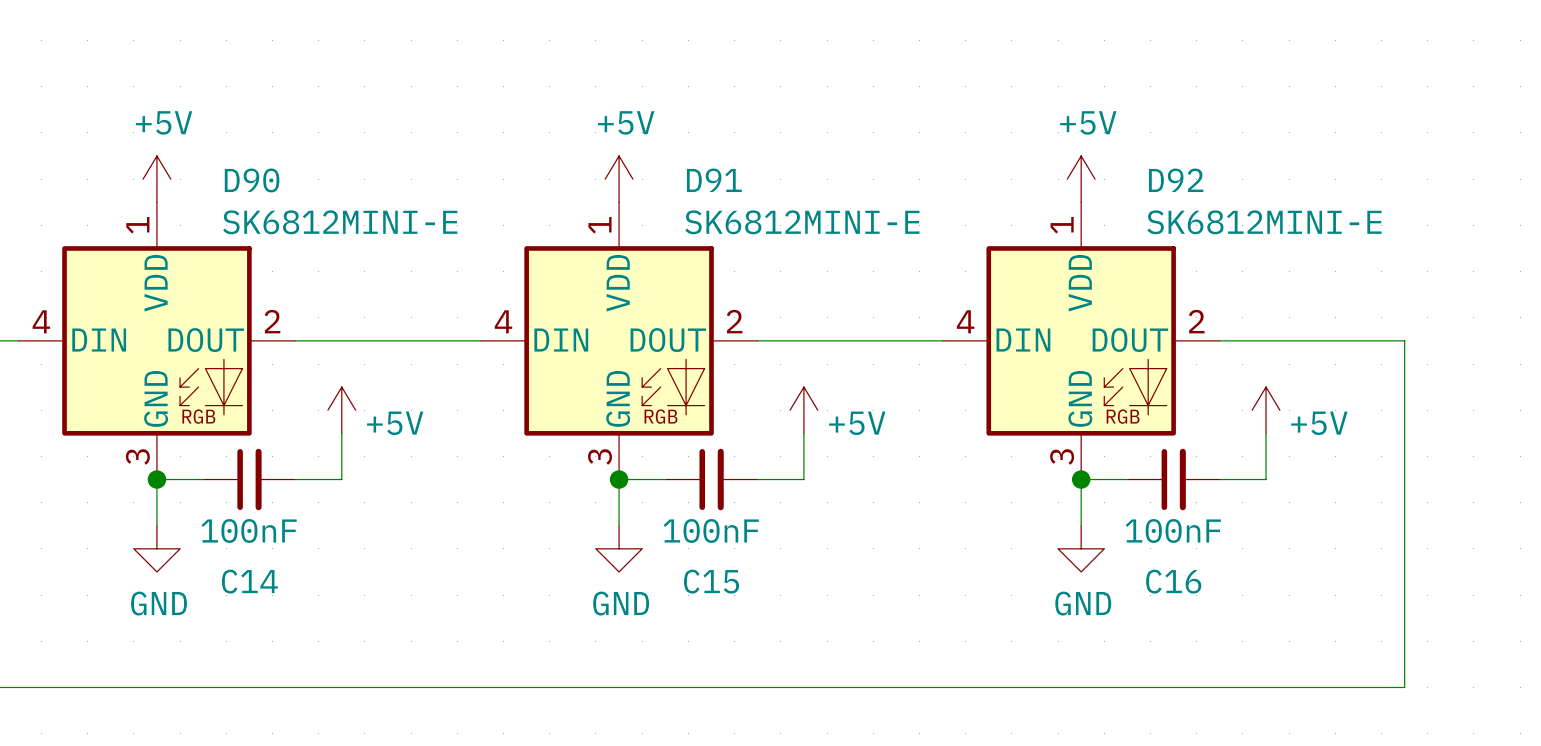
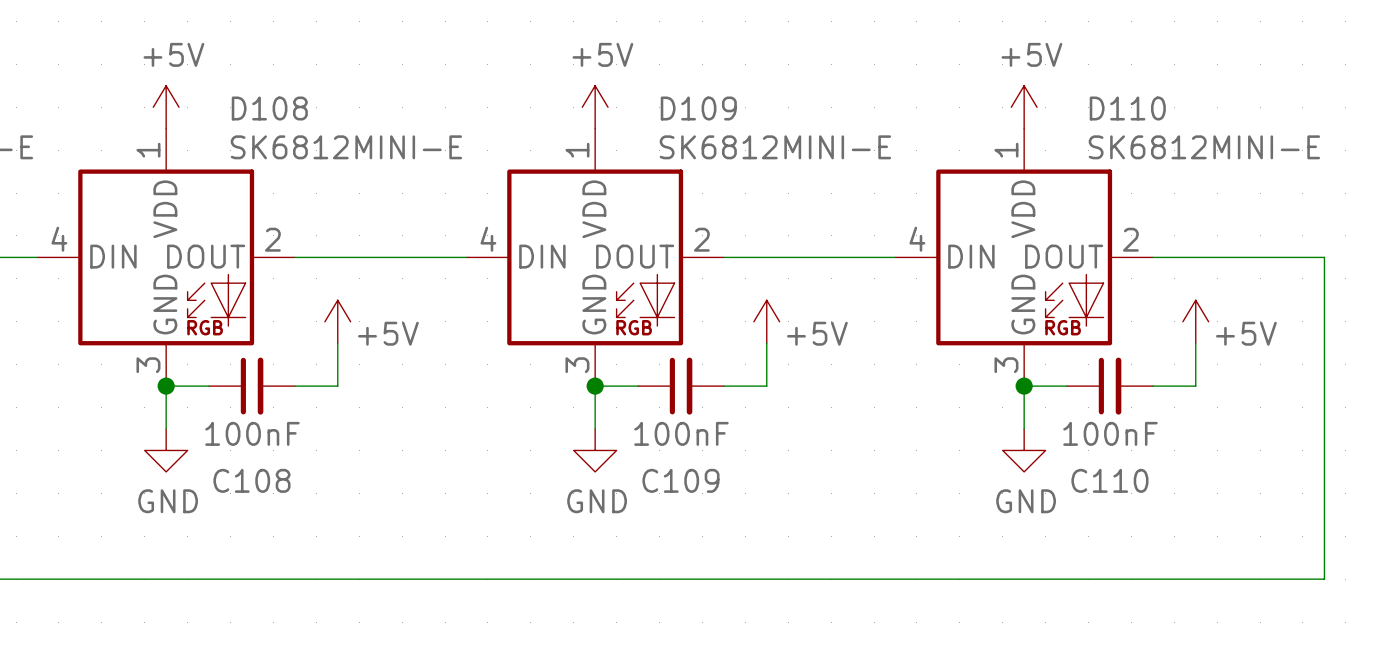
D90 name: D90 (252, 180) -> D108 (269, 108)
D91 name: D91 (714, 180) -> D109 (698, 108)
D92 name: D92 (1176, 180) -> D110 (1127, 108)
C14 name: C14 (249, 581) -> C108 (251, 480)
C15 name: C15 (711, 581) -> C109 (680, 480)
C16 name: C16 (1173, 581) -> C110 (1109, 480)

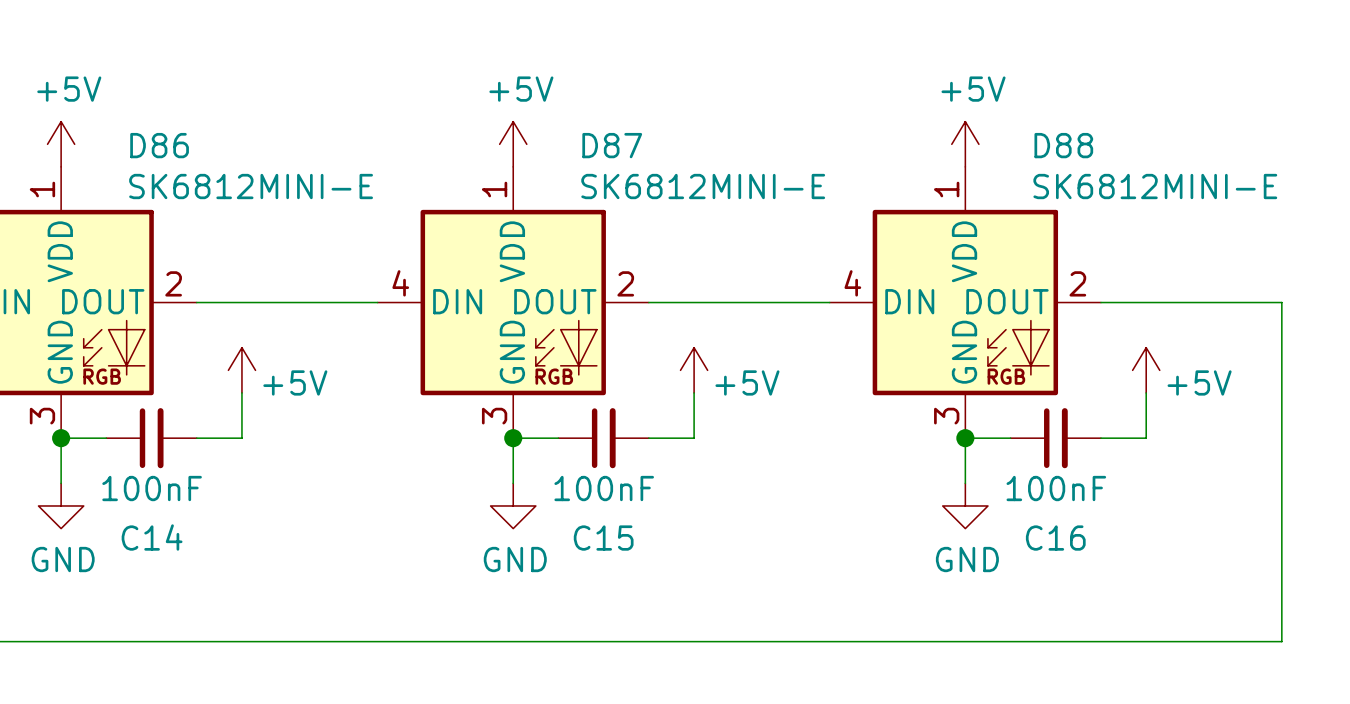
D108 name: D108 (269, 108) -> D86 (159, 145)
D109 name: D109 (698, 108) -> D87 (612, 145)
D110 name: D110 (1127, 108) -> D88 (1063, 145)
C108 name: C108 (251, 480) -> C14 (152, 537)
C109 name: C109 (680, 480) -> C15 (603, 538)
C110 name: C110 (1109, 480) -> C16 (1055, 538)

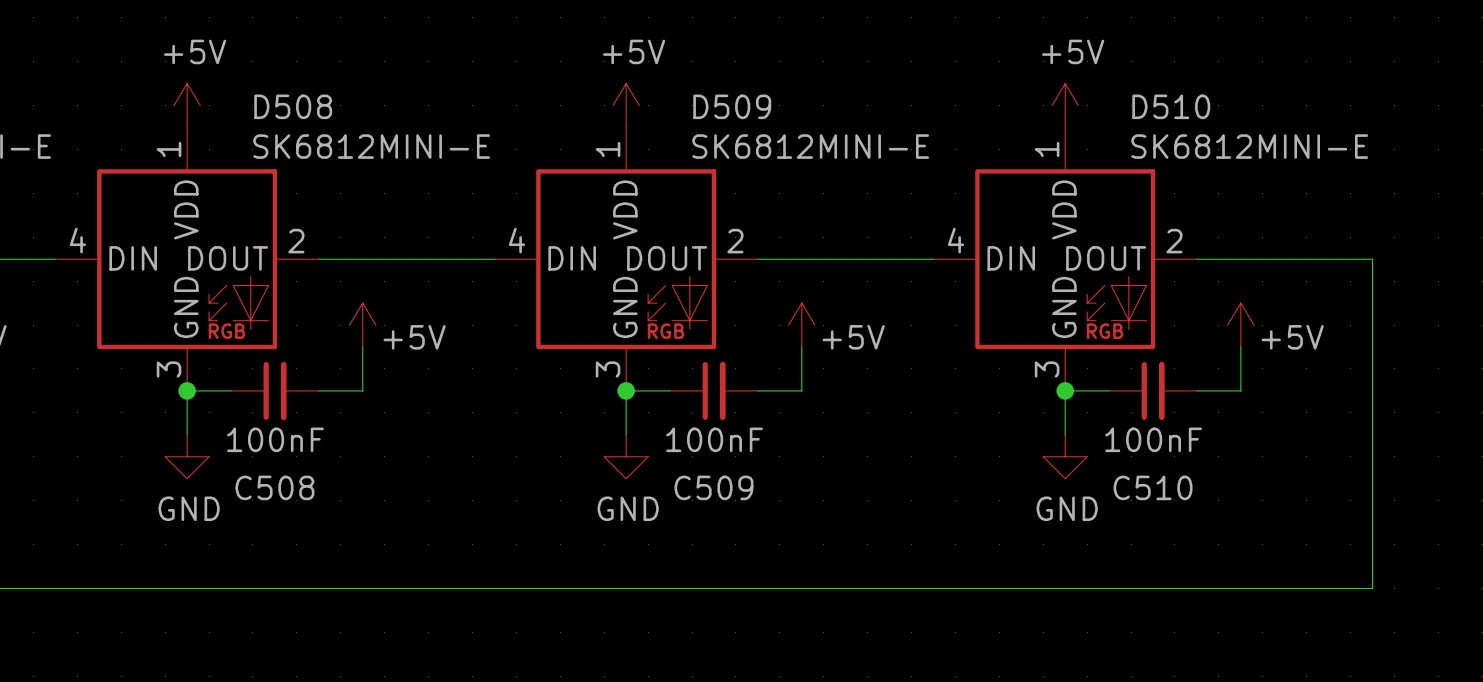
D86 name: D86 (159, 145) -> D508 (293, 106)
D87 name: D87 (612, 145) -> D509 (732, 106)
D88 name: D88 (1063, 145) -> D510 (1171, 106)
C14 name: C14 (152, 537) -> C508 (274, 487)
C15 name: C15 (603, 538) -> C509 (713, 487)
C16 name: C16 (1055, 538) -> C510 (1153, 487)

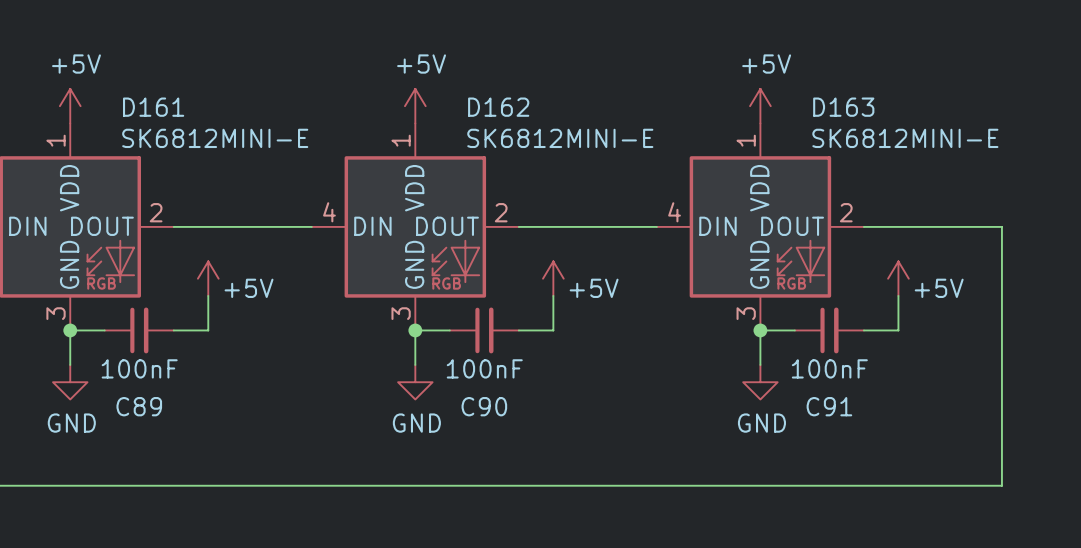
D508 name: D508 (293, 106) -> D161 (153, 107)
D509 name: D509 (732, 106) -> D162 (498, 107)
D510 name: D510 (1171, 106) -> D163 (843, 107)
C508 name: C508 (274, 487) -> C89 (139, 406)
C509 name: C509 (713, 487) -> C90 (484, 406)
C510 name: C510 (1153, 487) -> C91 (829, 406)

